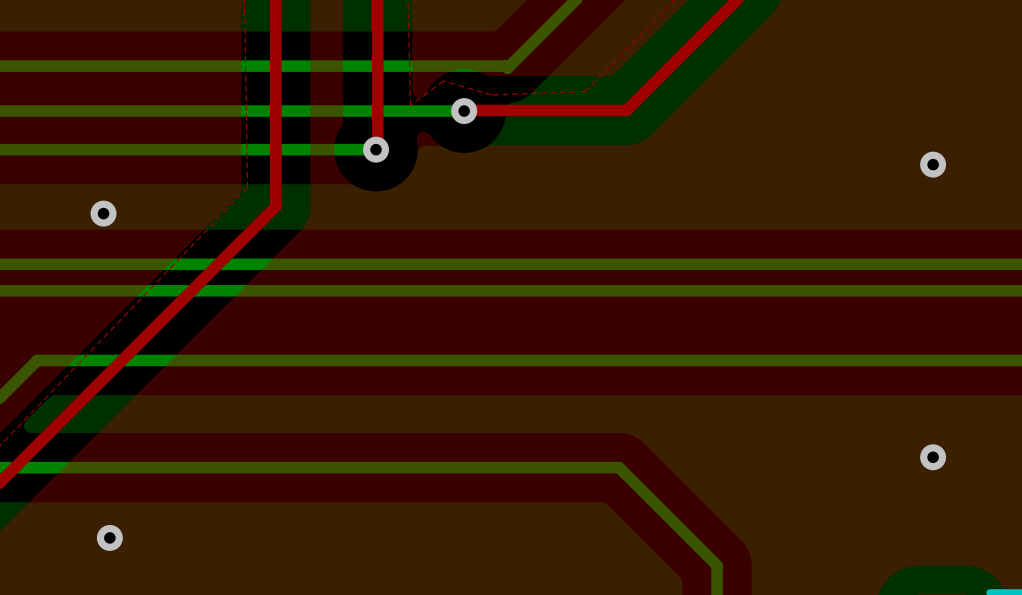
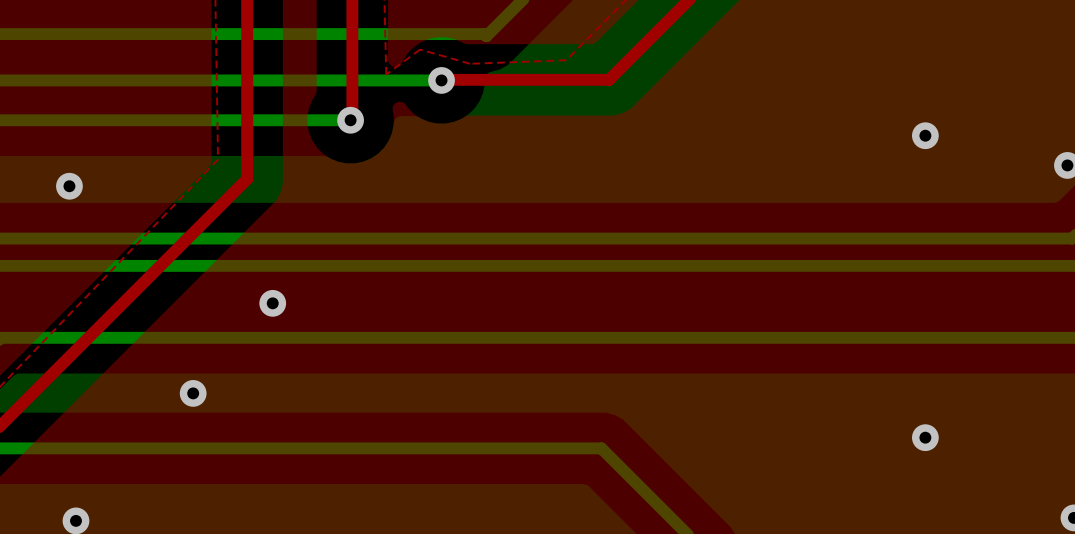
via: none -> (272, 303)
via: none -> (193, 393)

